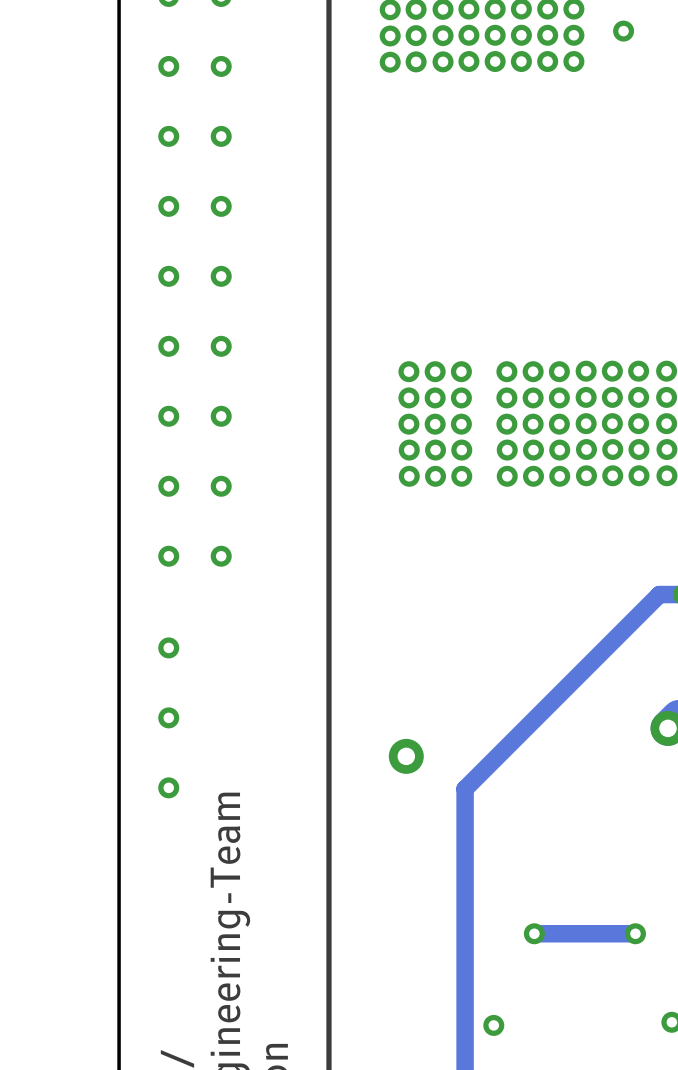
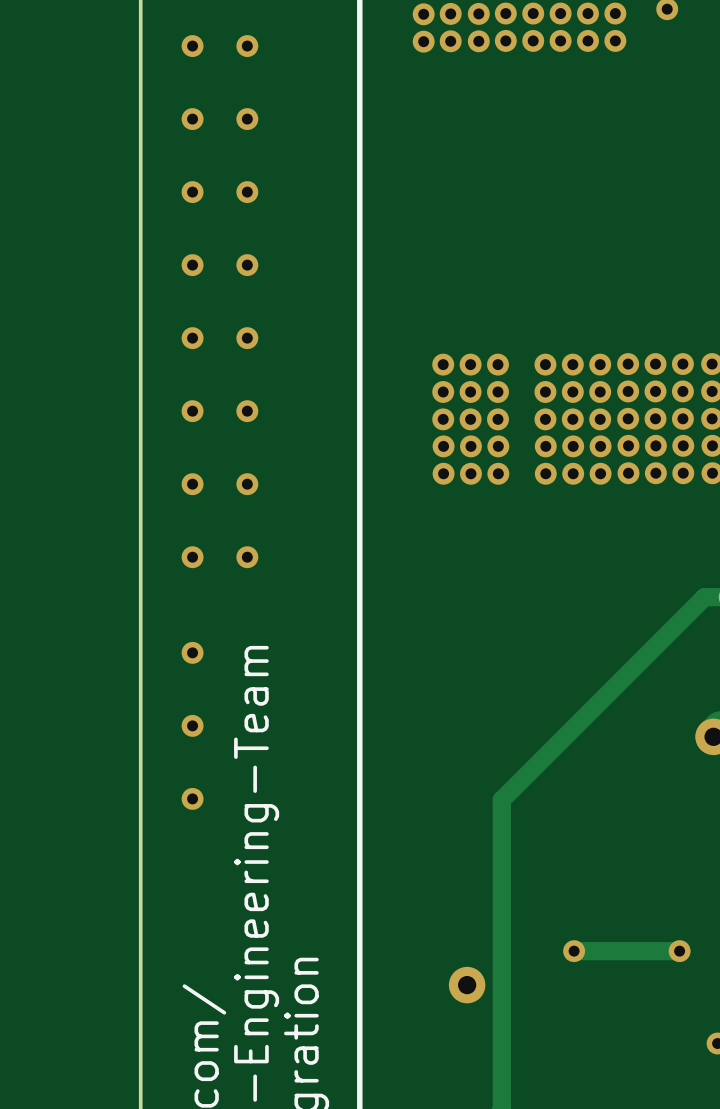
via: (406, 756) -> none
via: none -> (467, 985)
via: (493, 1025) -> none

